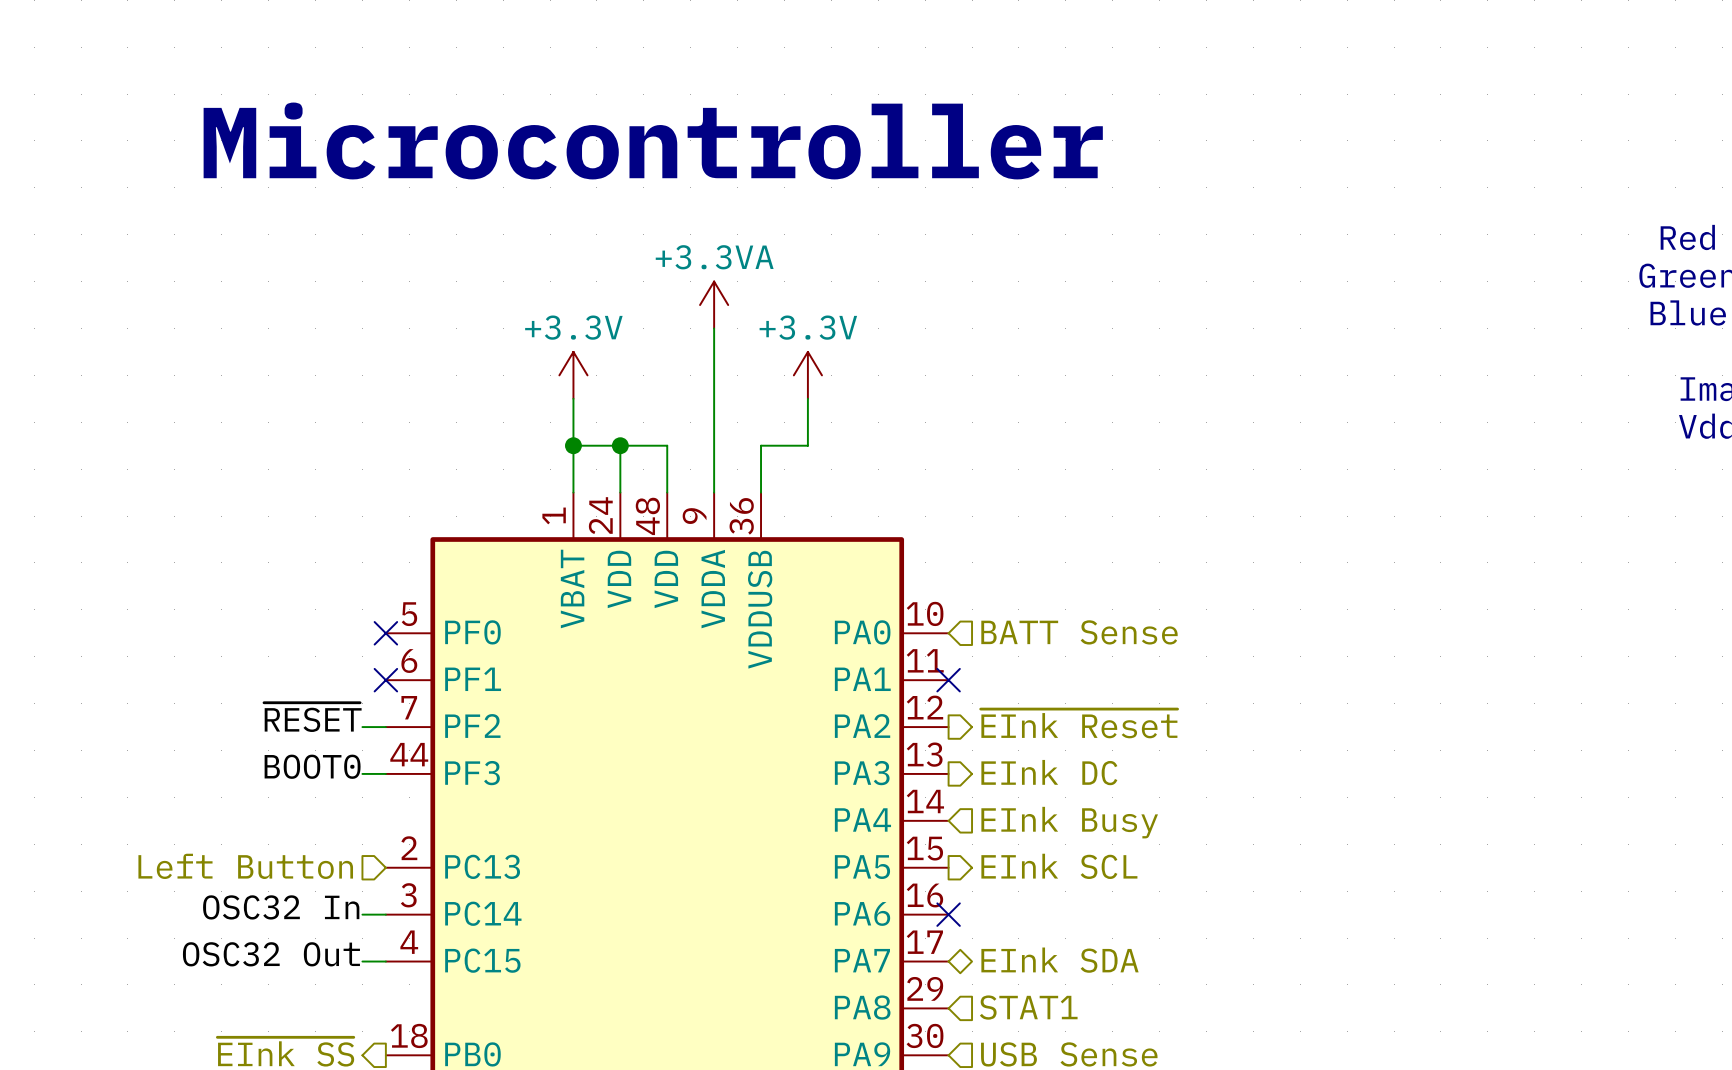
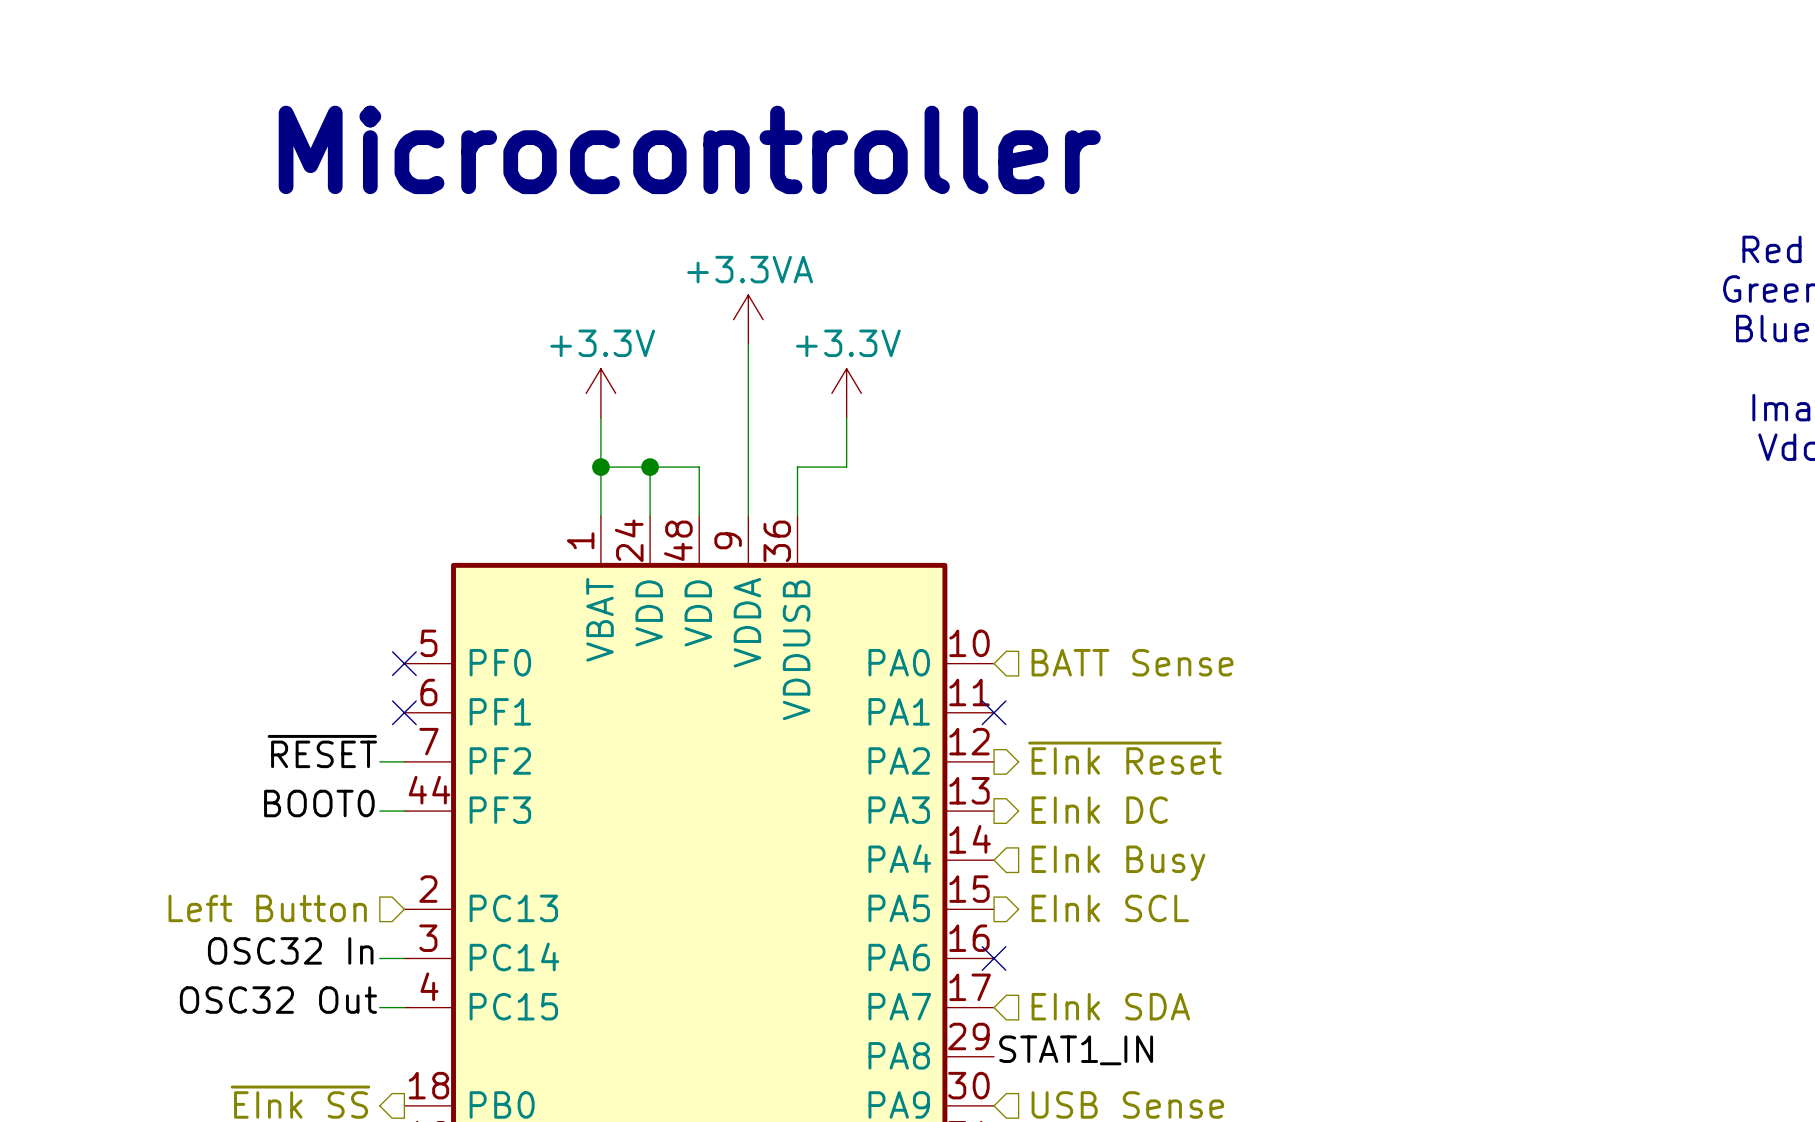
hierarchical label shape: bidirectional (1059, 960) -> input (1110, 1006)
label: none -> STAT1_IN (1076, 1050)
hierarchical label: STAT1 (1028, 1007) -> none

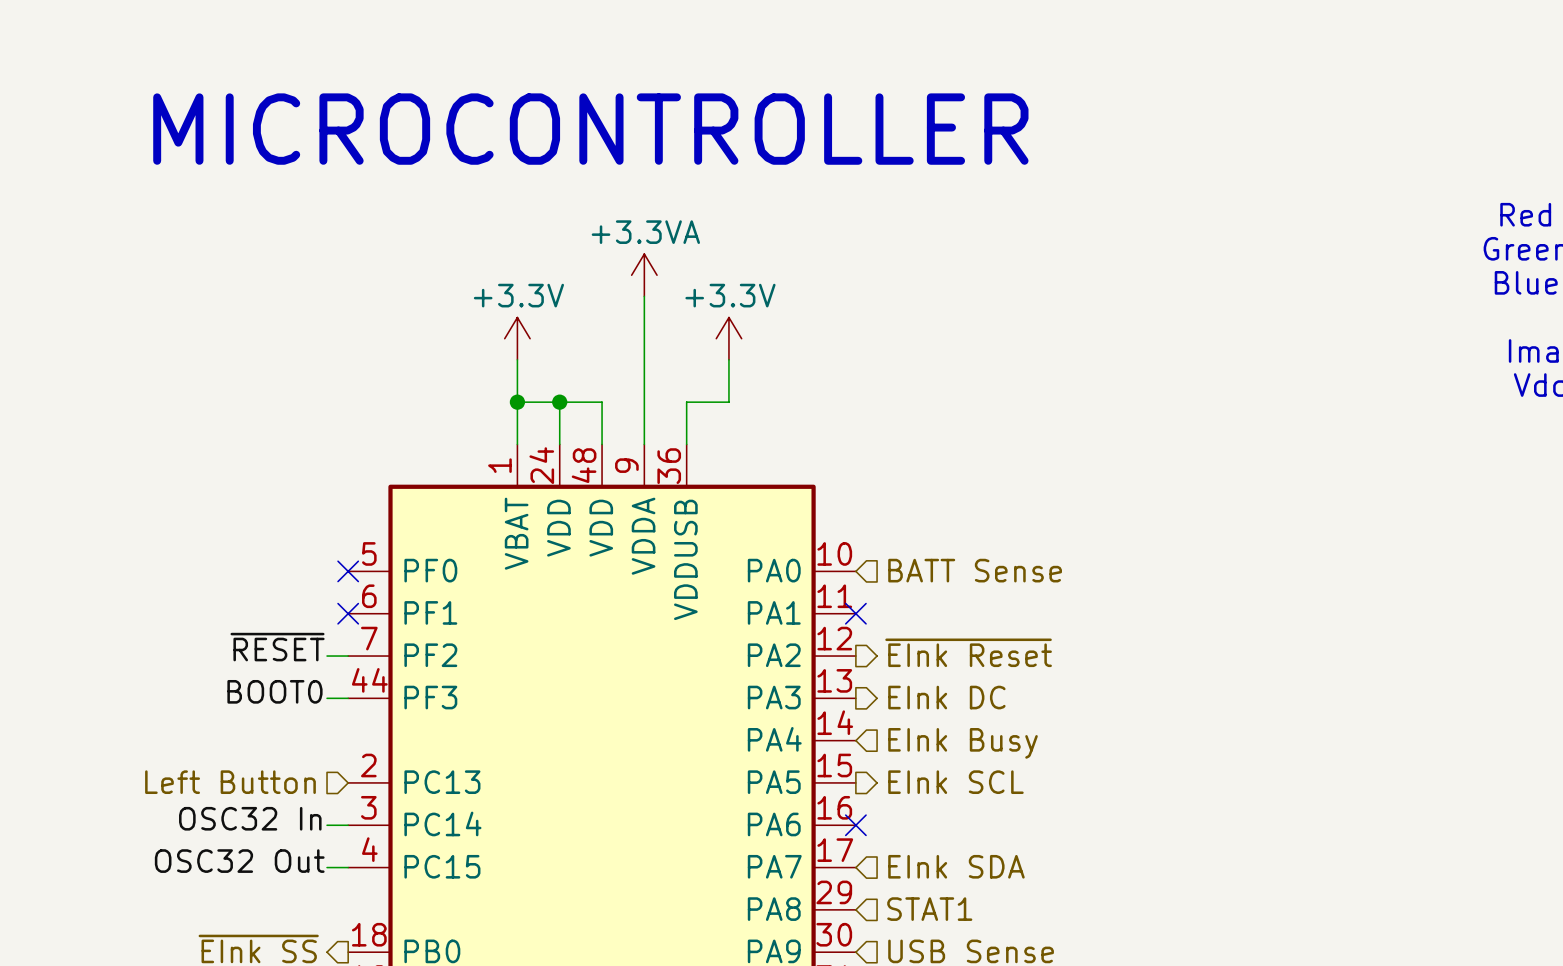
text: Microcontroller (689, 149) -> MICROCONTROLLER (590, 129)
label: STAT1_IN (1076, 1050) -> none
hierarchical label: none -> STAT1 (929, 909)

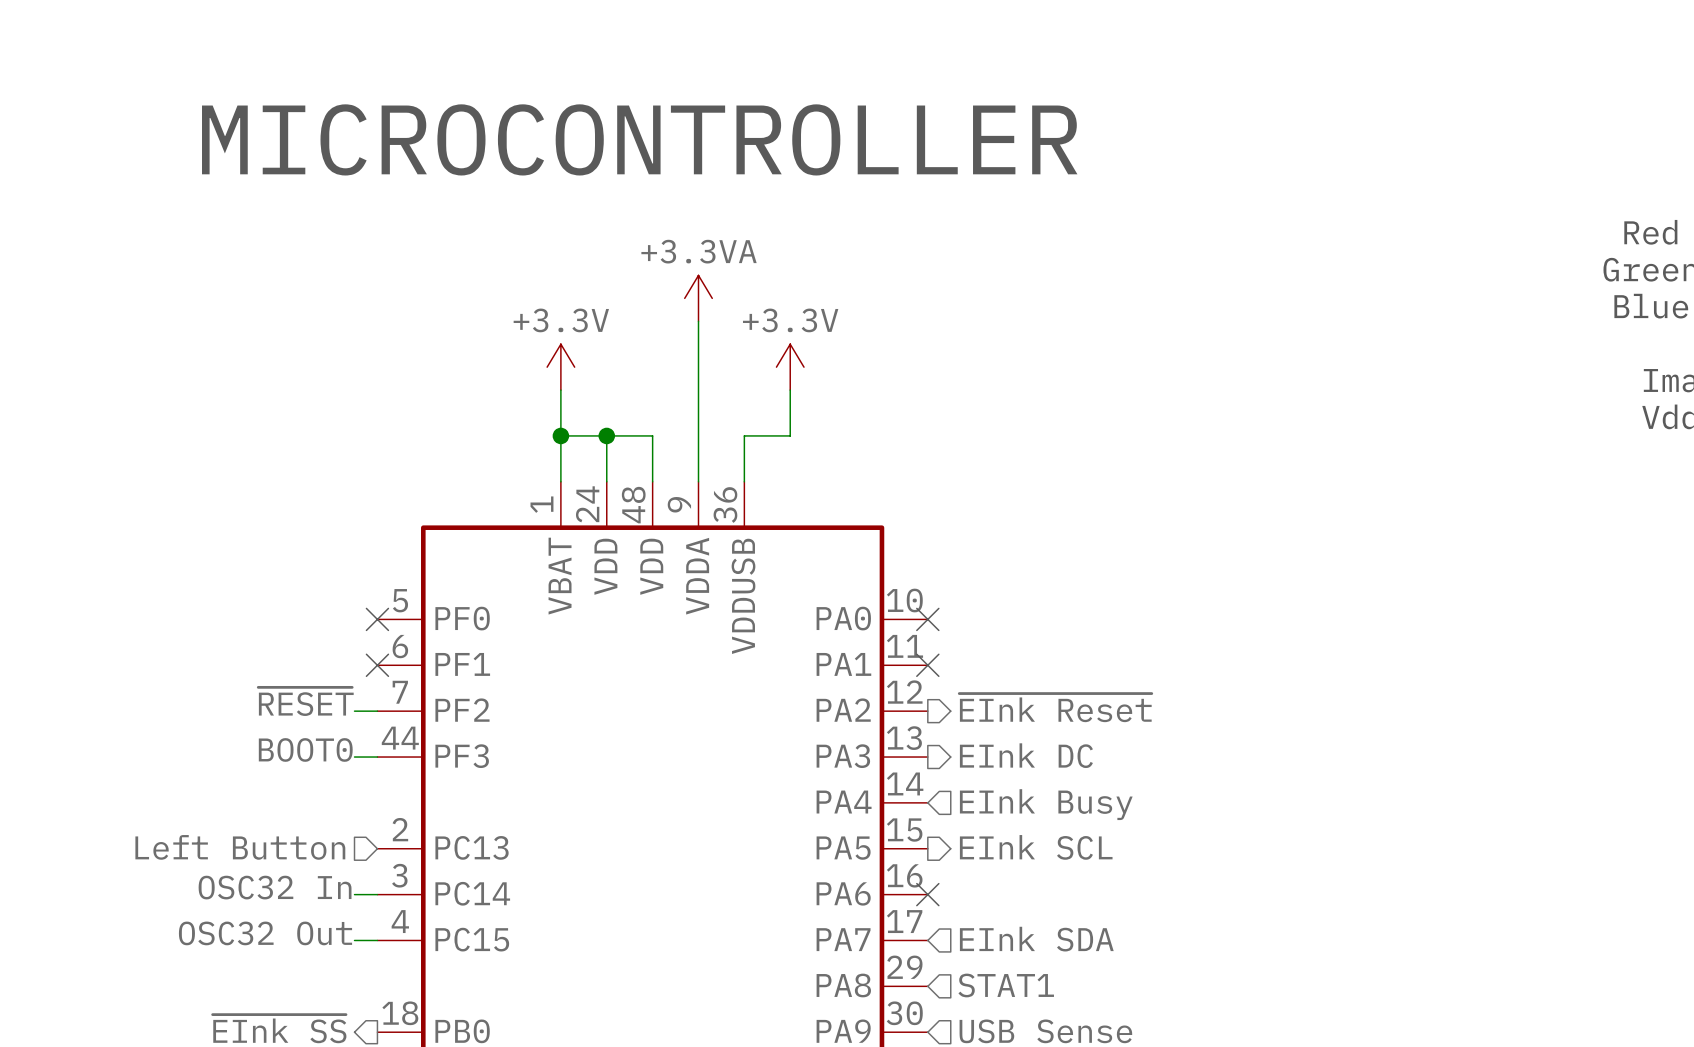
hierarchical label: BATT Sense (975, 570) -> none
no-connect mark: none -> (927, 619)

